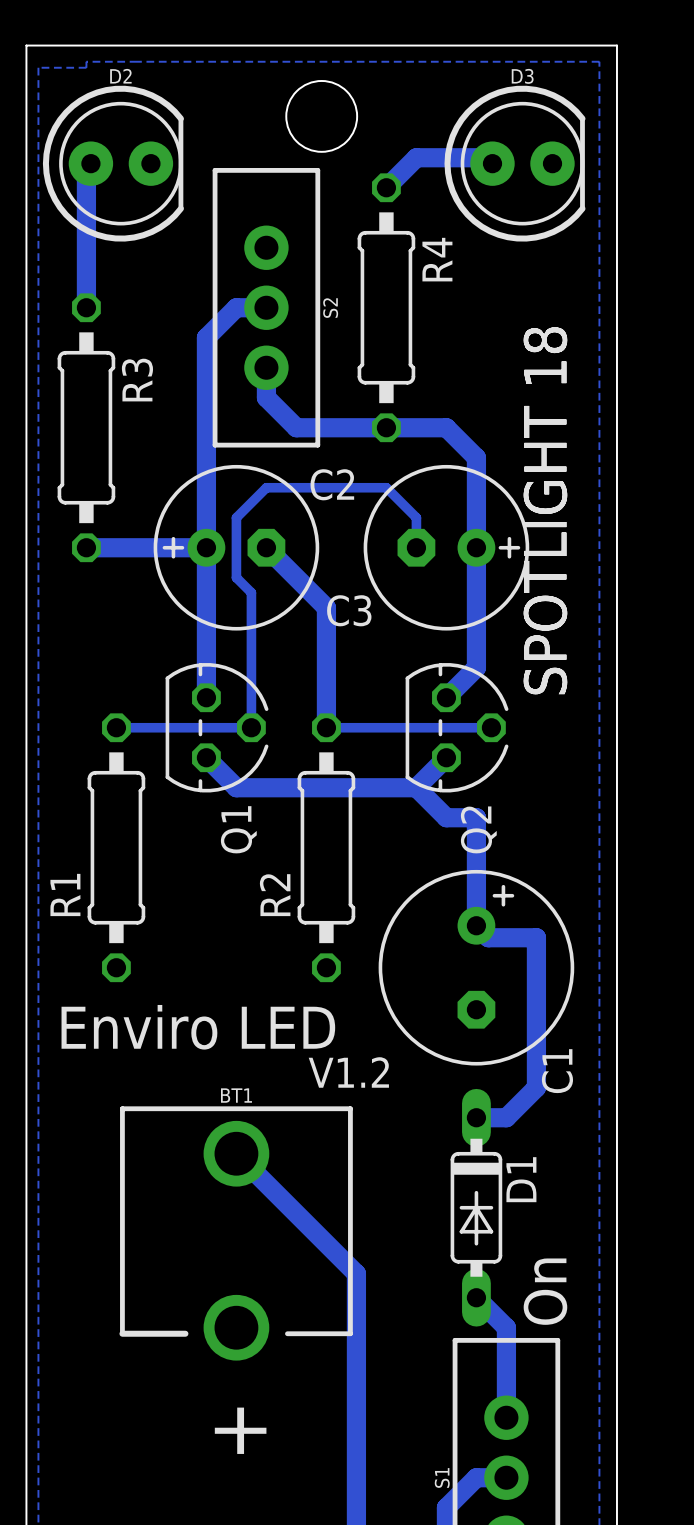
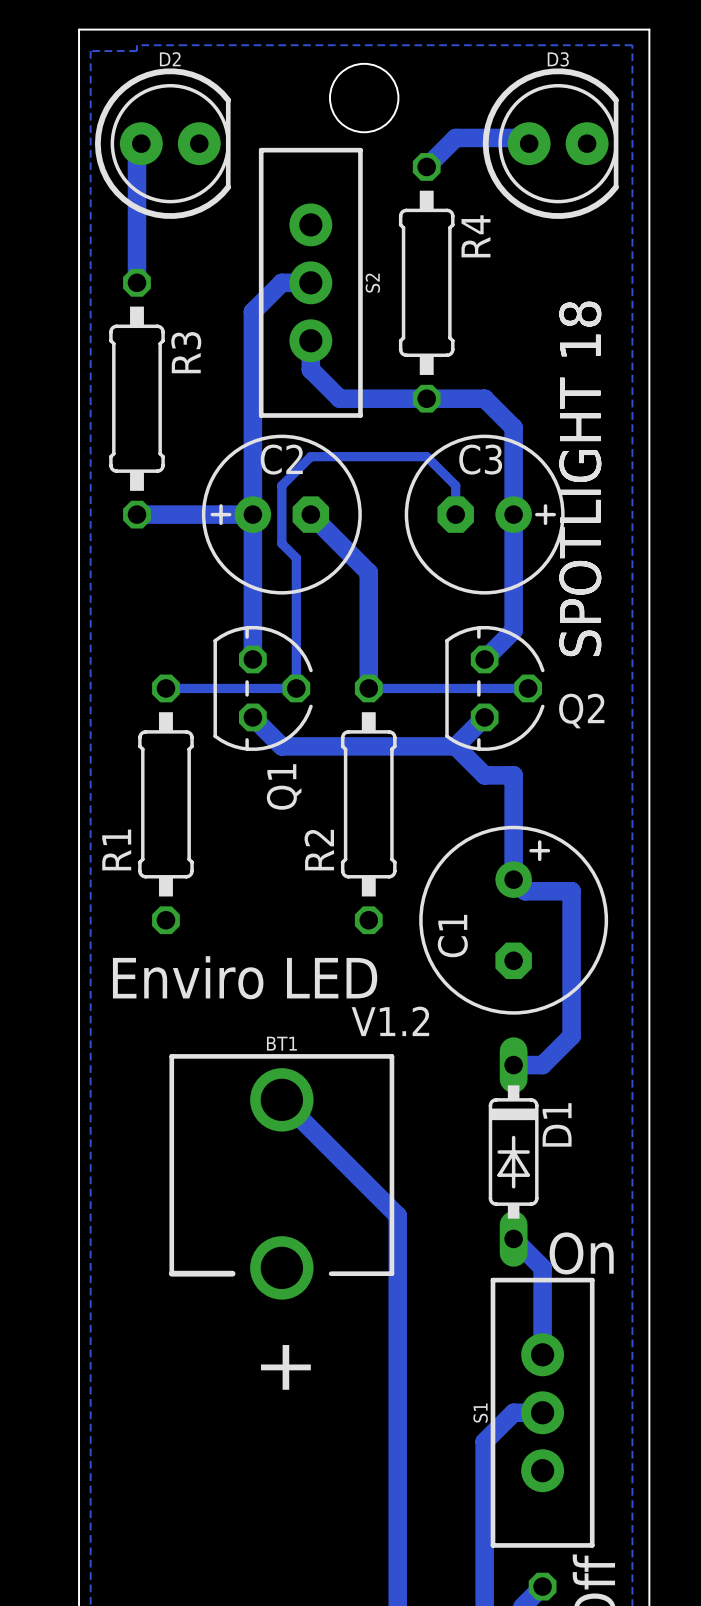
C2 name position: C2 (332, 484) -> C2 (281, 459)
C3 name position: C3 (349, 610) -> C3 (480, 459)
Q2 name rotation: 0° (478, 829) -> 90° clockwise (581, 711)
Q2 name position: Q2 (478, 829) -> Q2 (581, 711)
C1 name position: C1 (557, 1071) -> C1 (452, 936)
text rotation: 0° (545, 1291) -> 90° clockwise (581, 1253)

